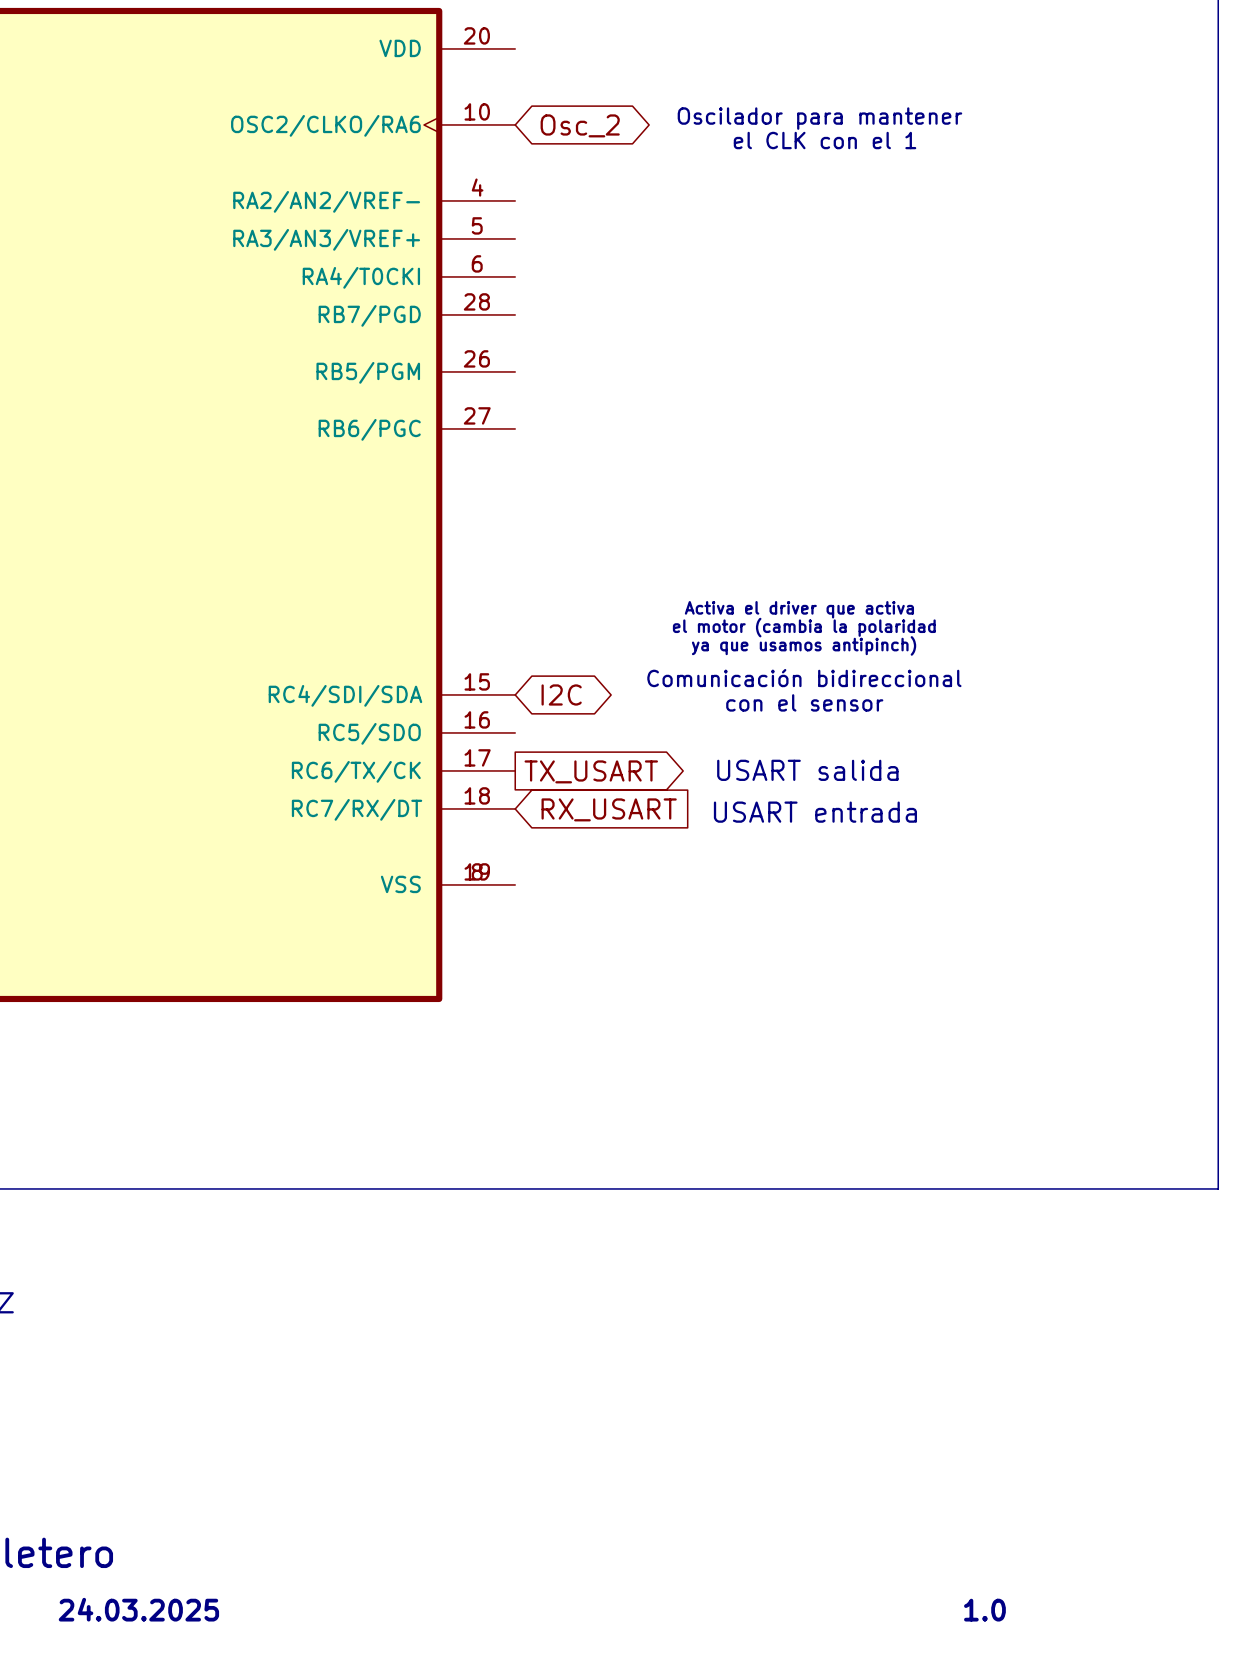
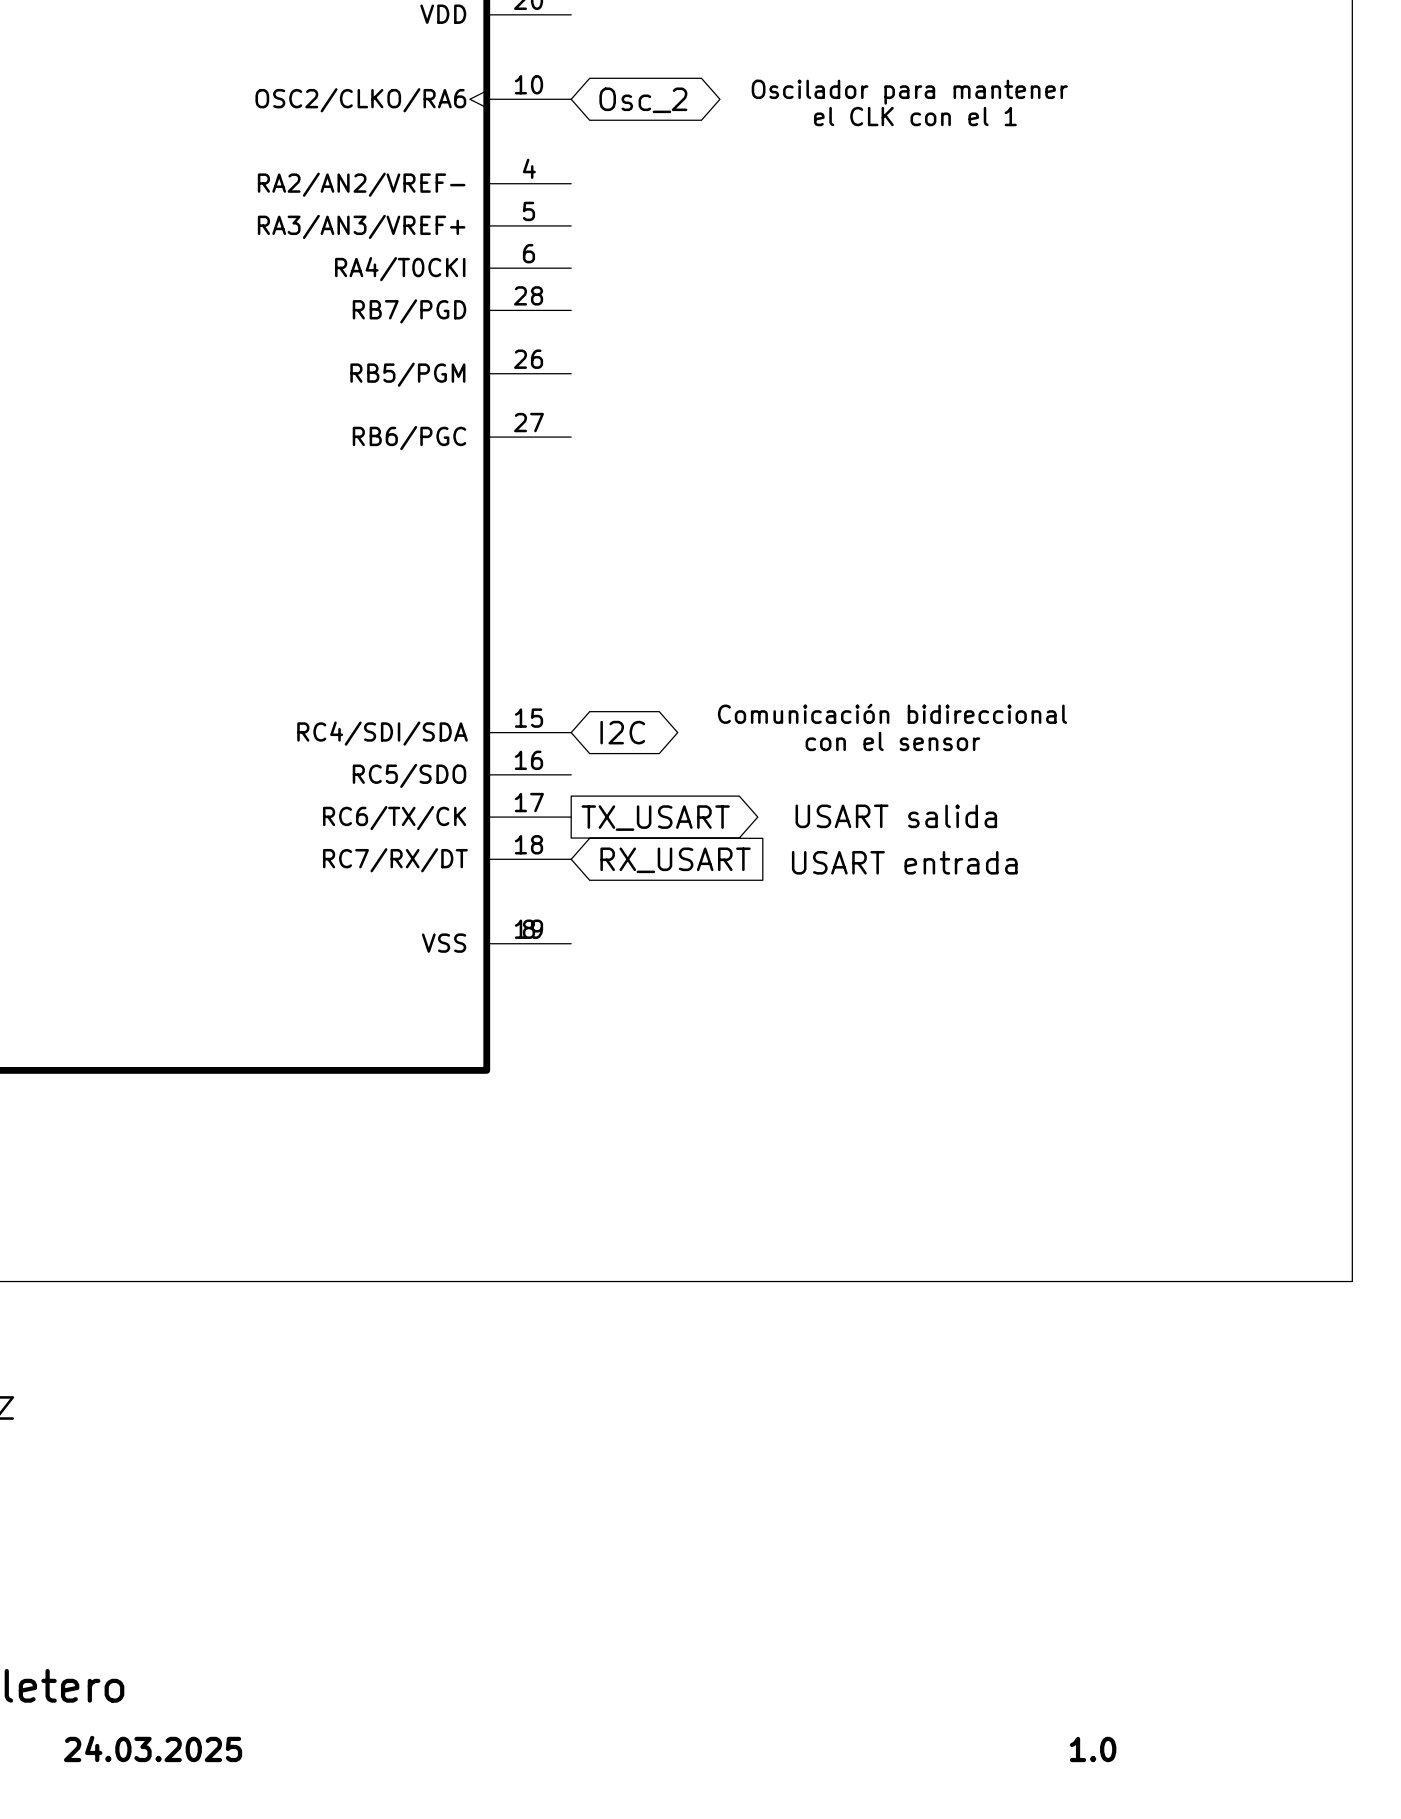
text: Activa el driver que activa (799, 609) -> none
text: el motor (cambia la polaridad (804, 627) -> none
text: ya que usamos antipinch) (804, 645) -> none

